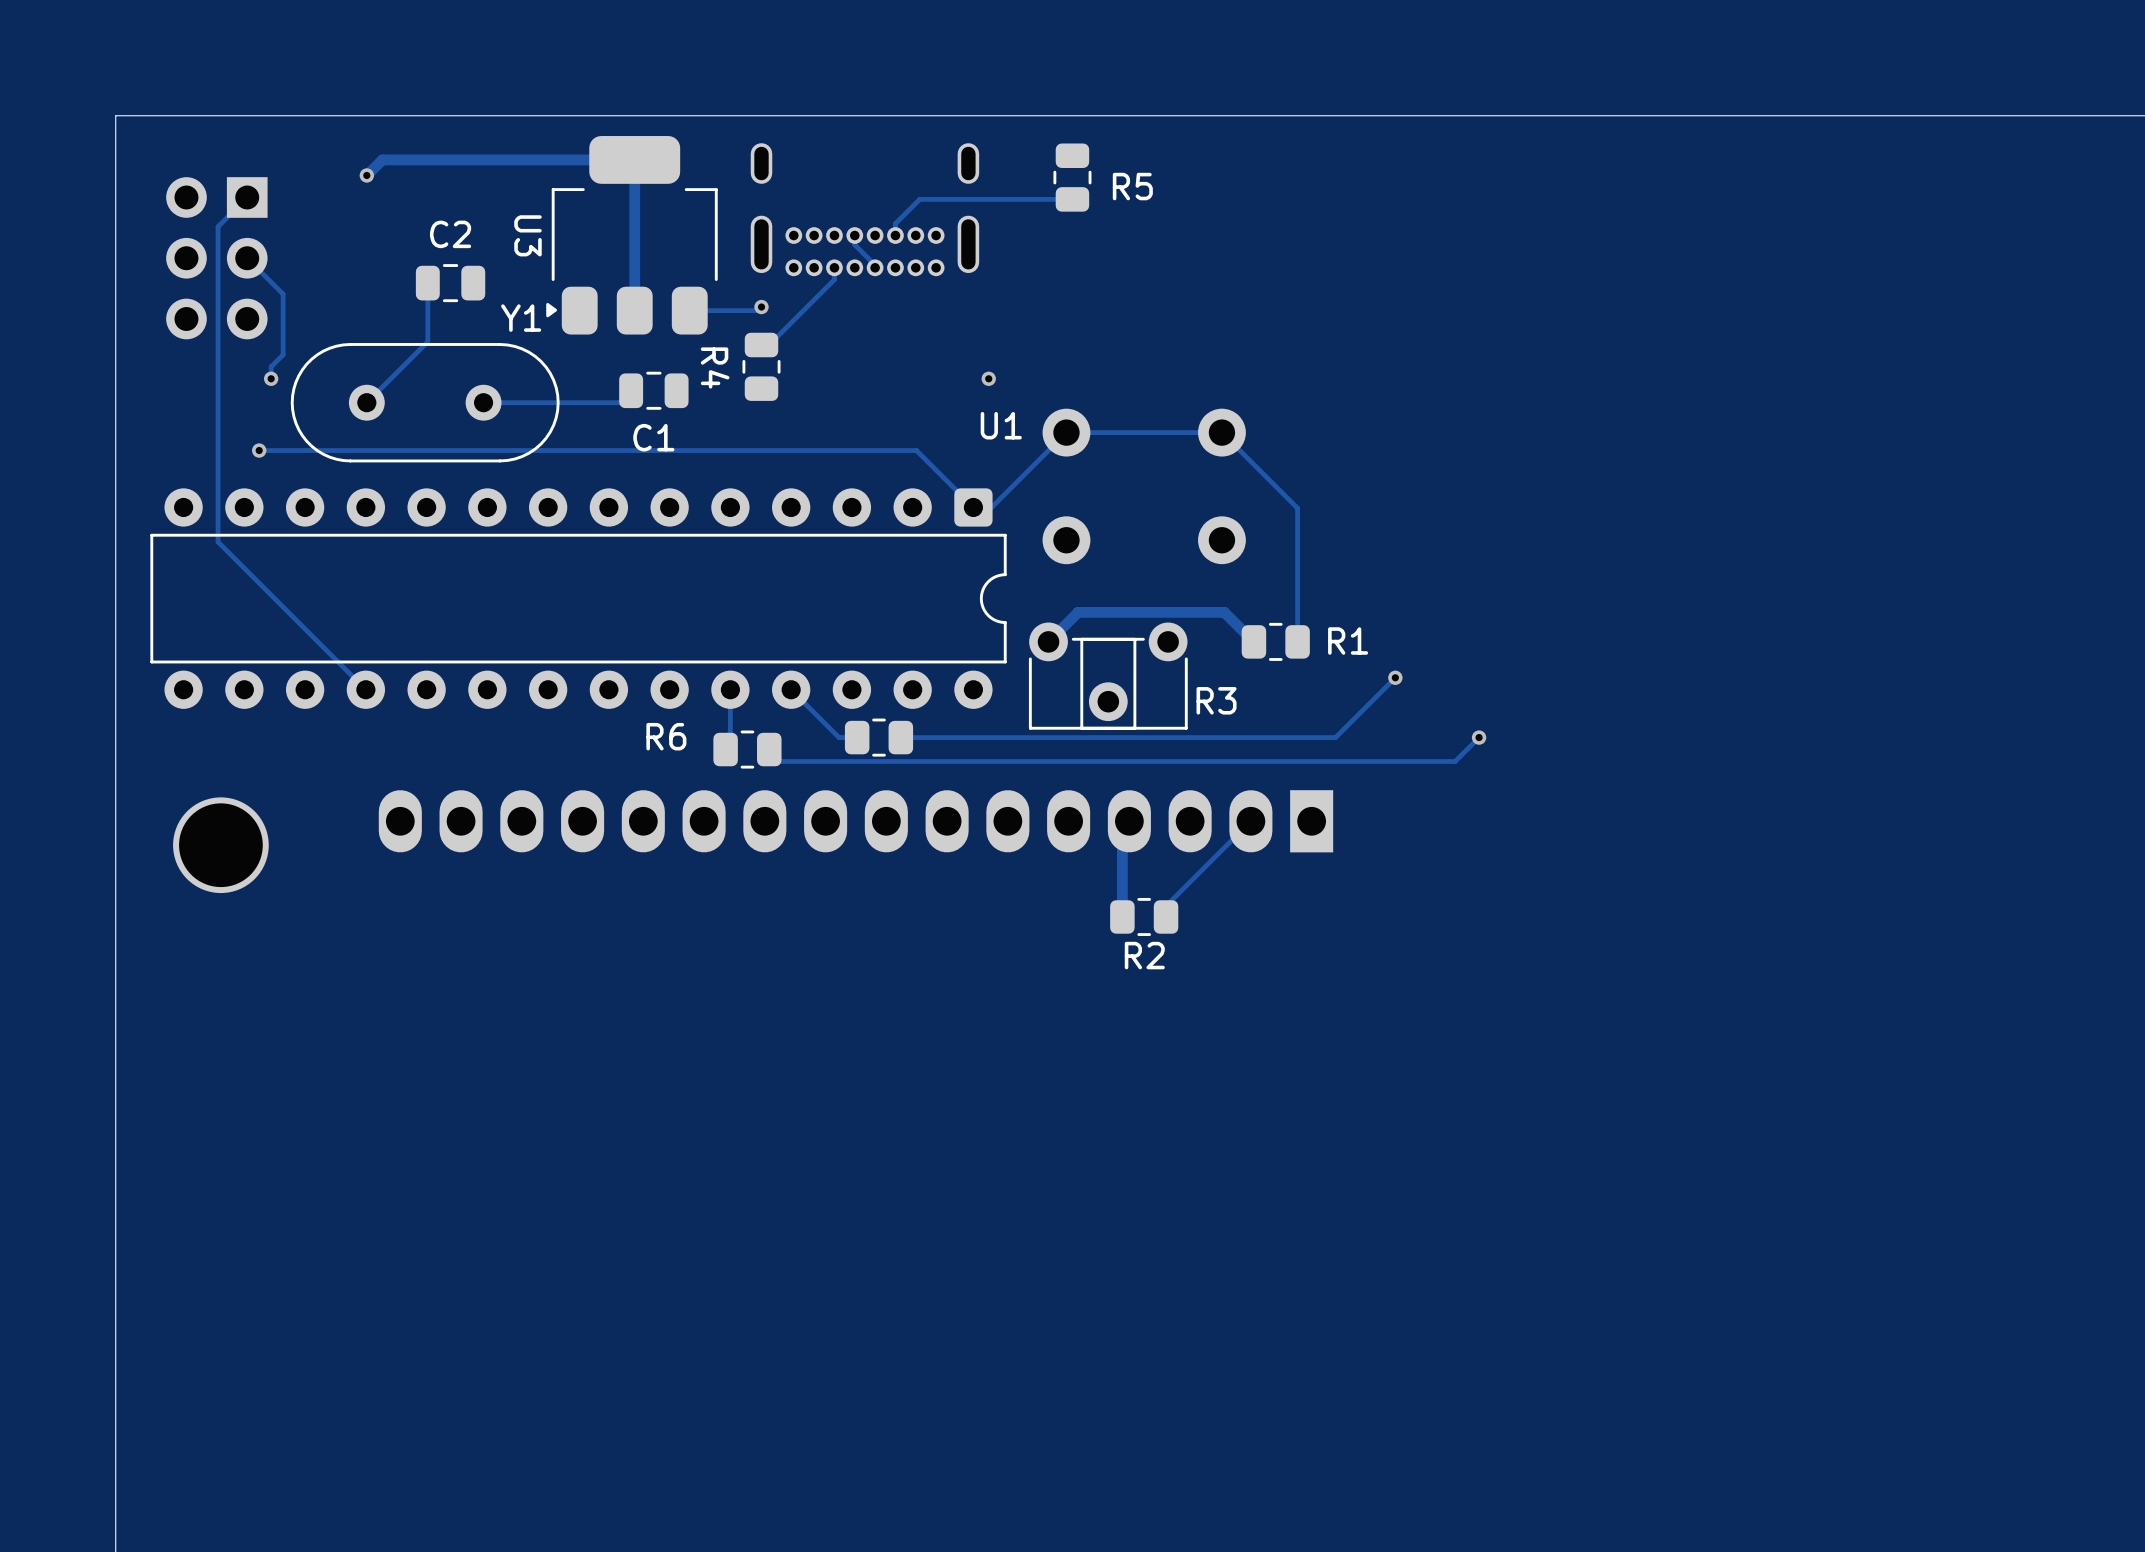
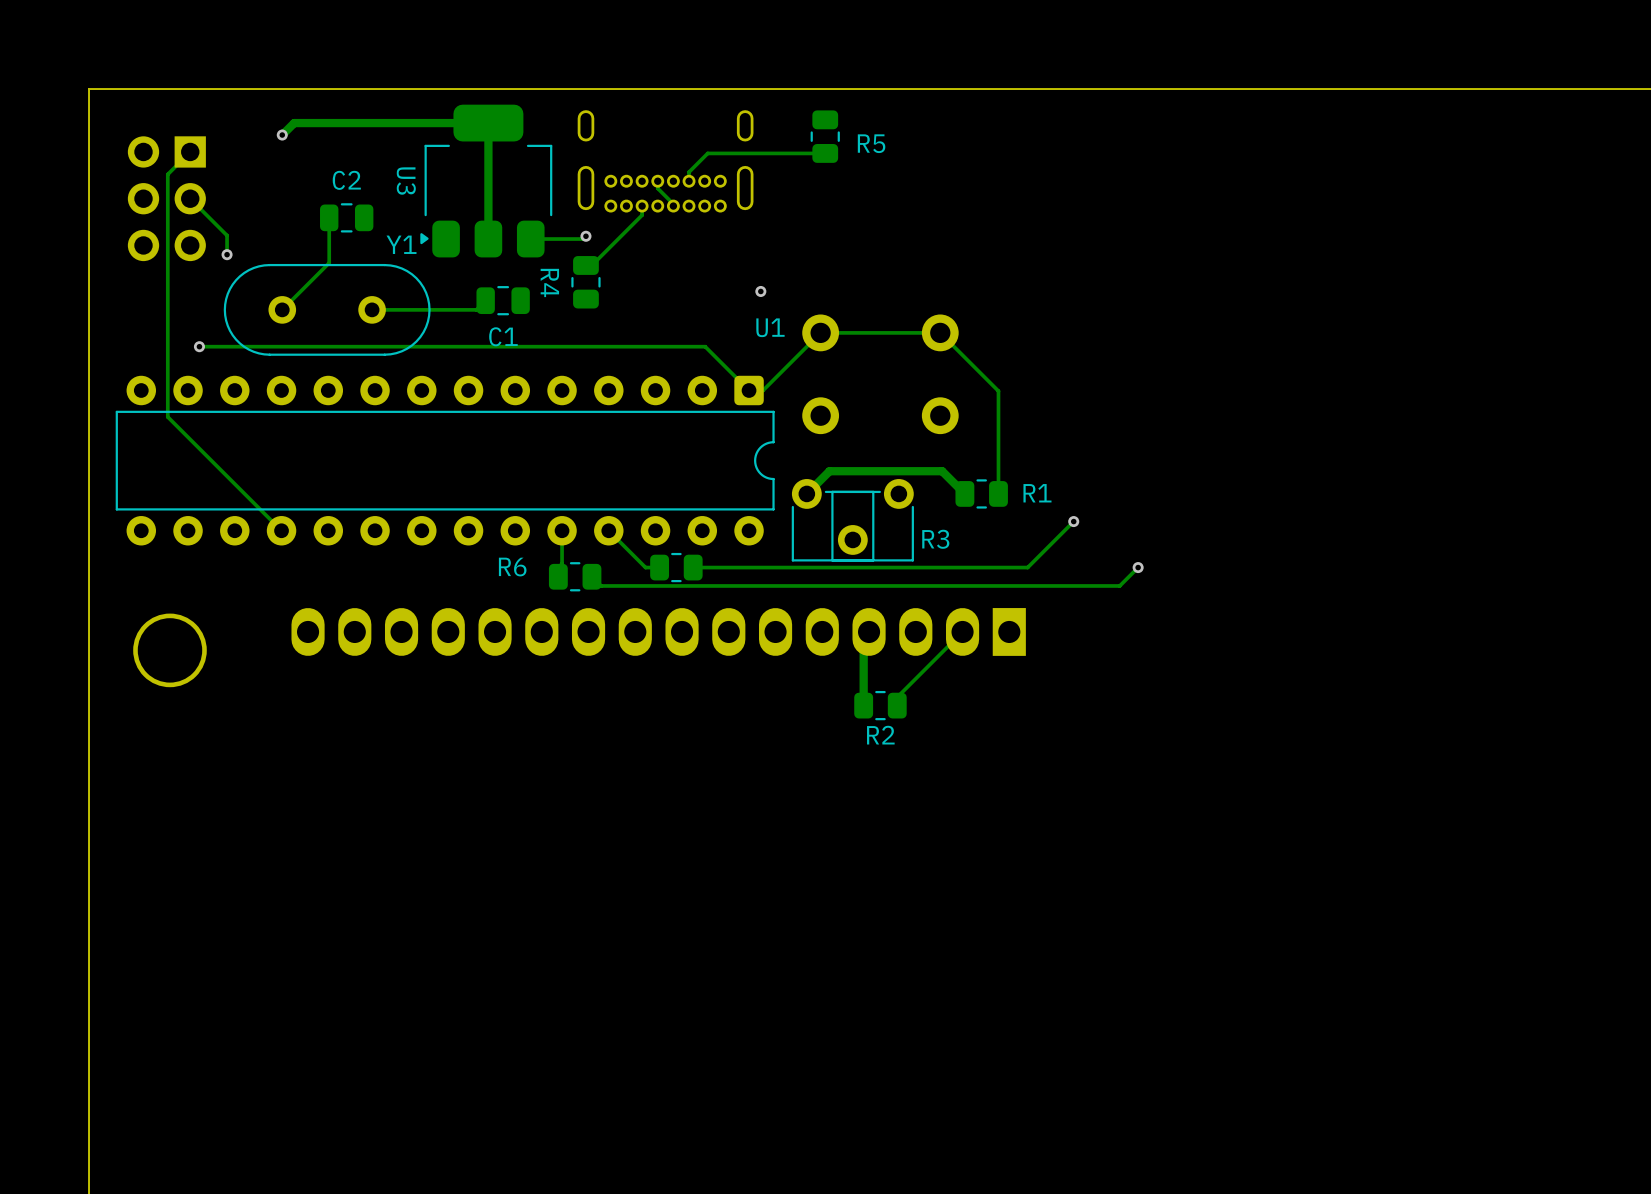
track: (283, 294) (283, 354) (271, 366) (271, 378) -> (217, 226) (227, 235) (227, 254)
via position: (271, 378) -> (227, 254)

